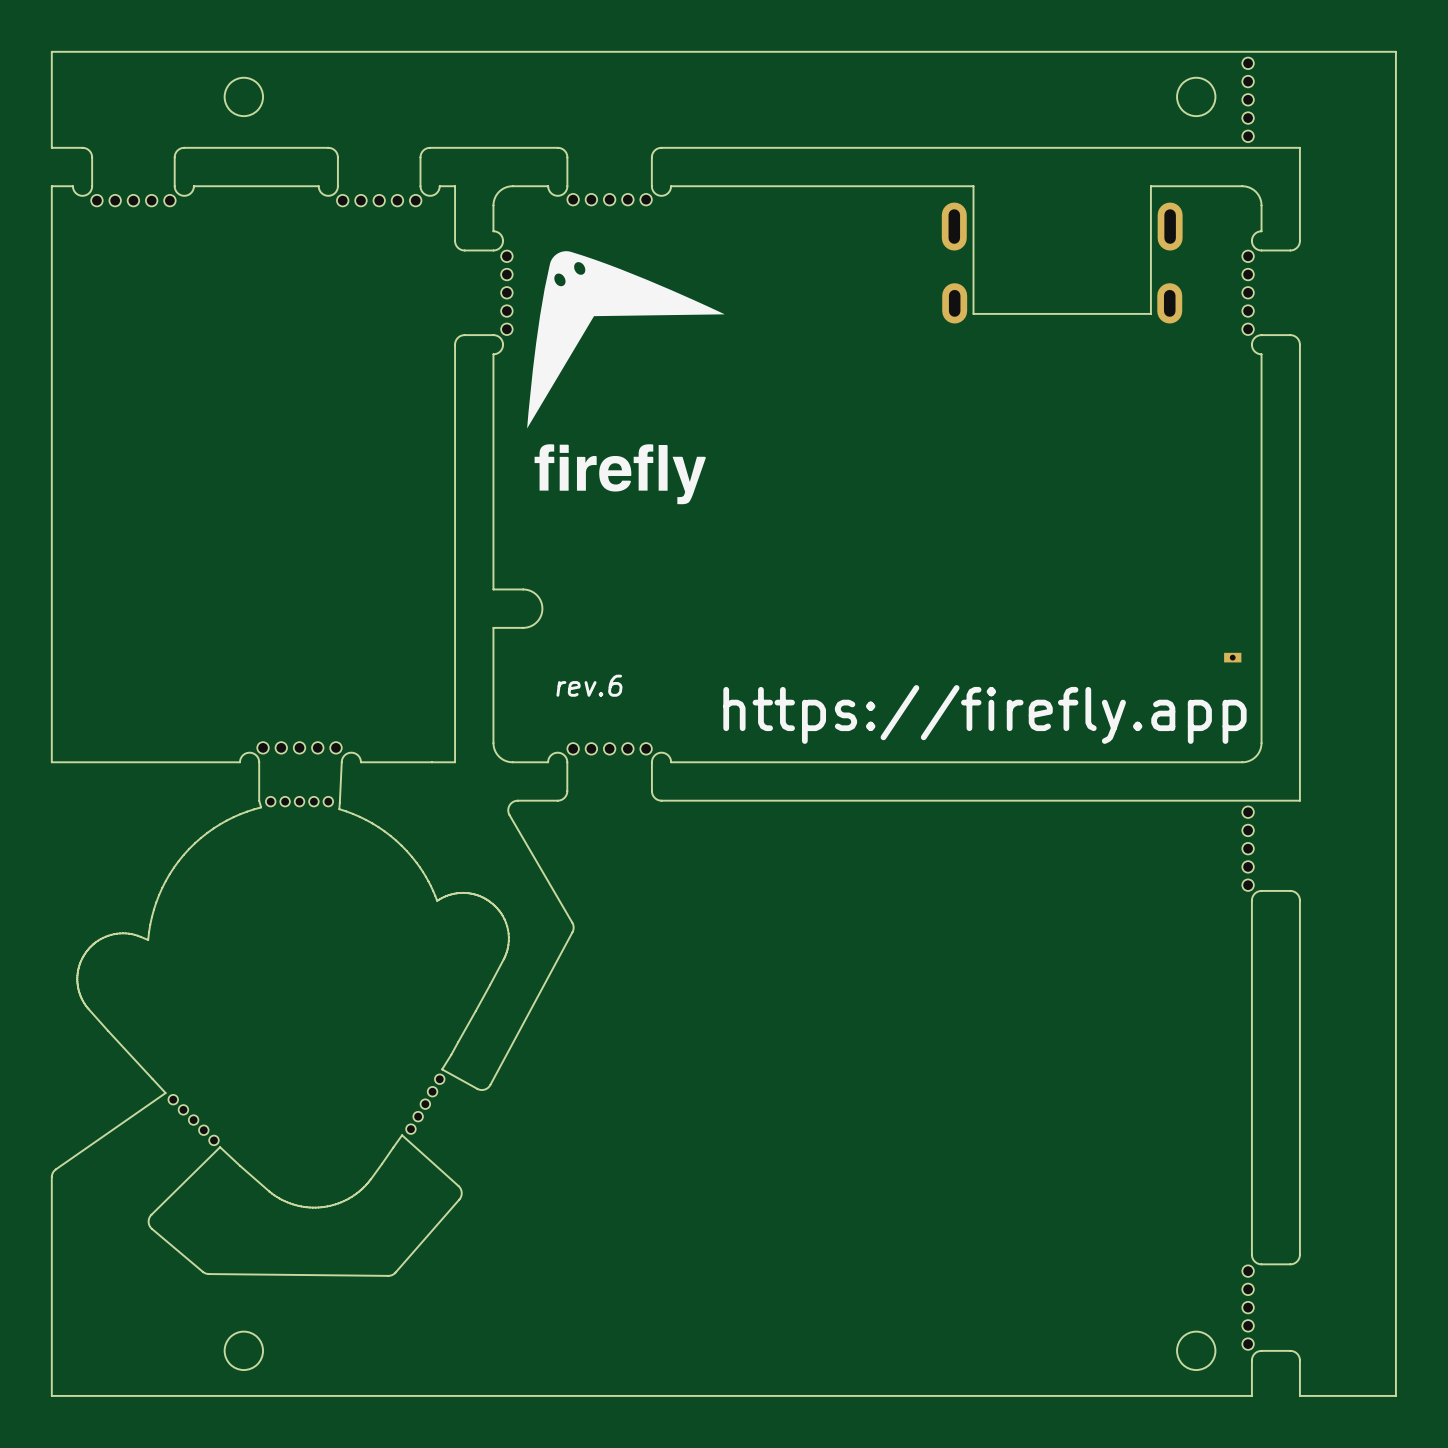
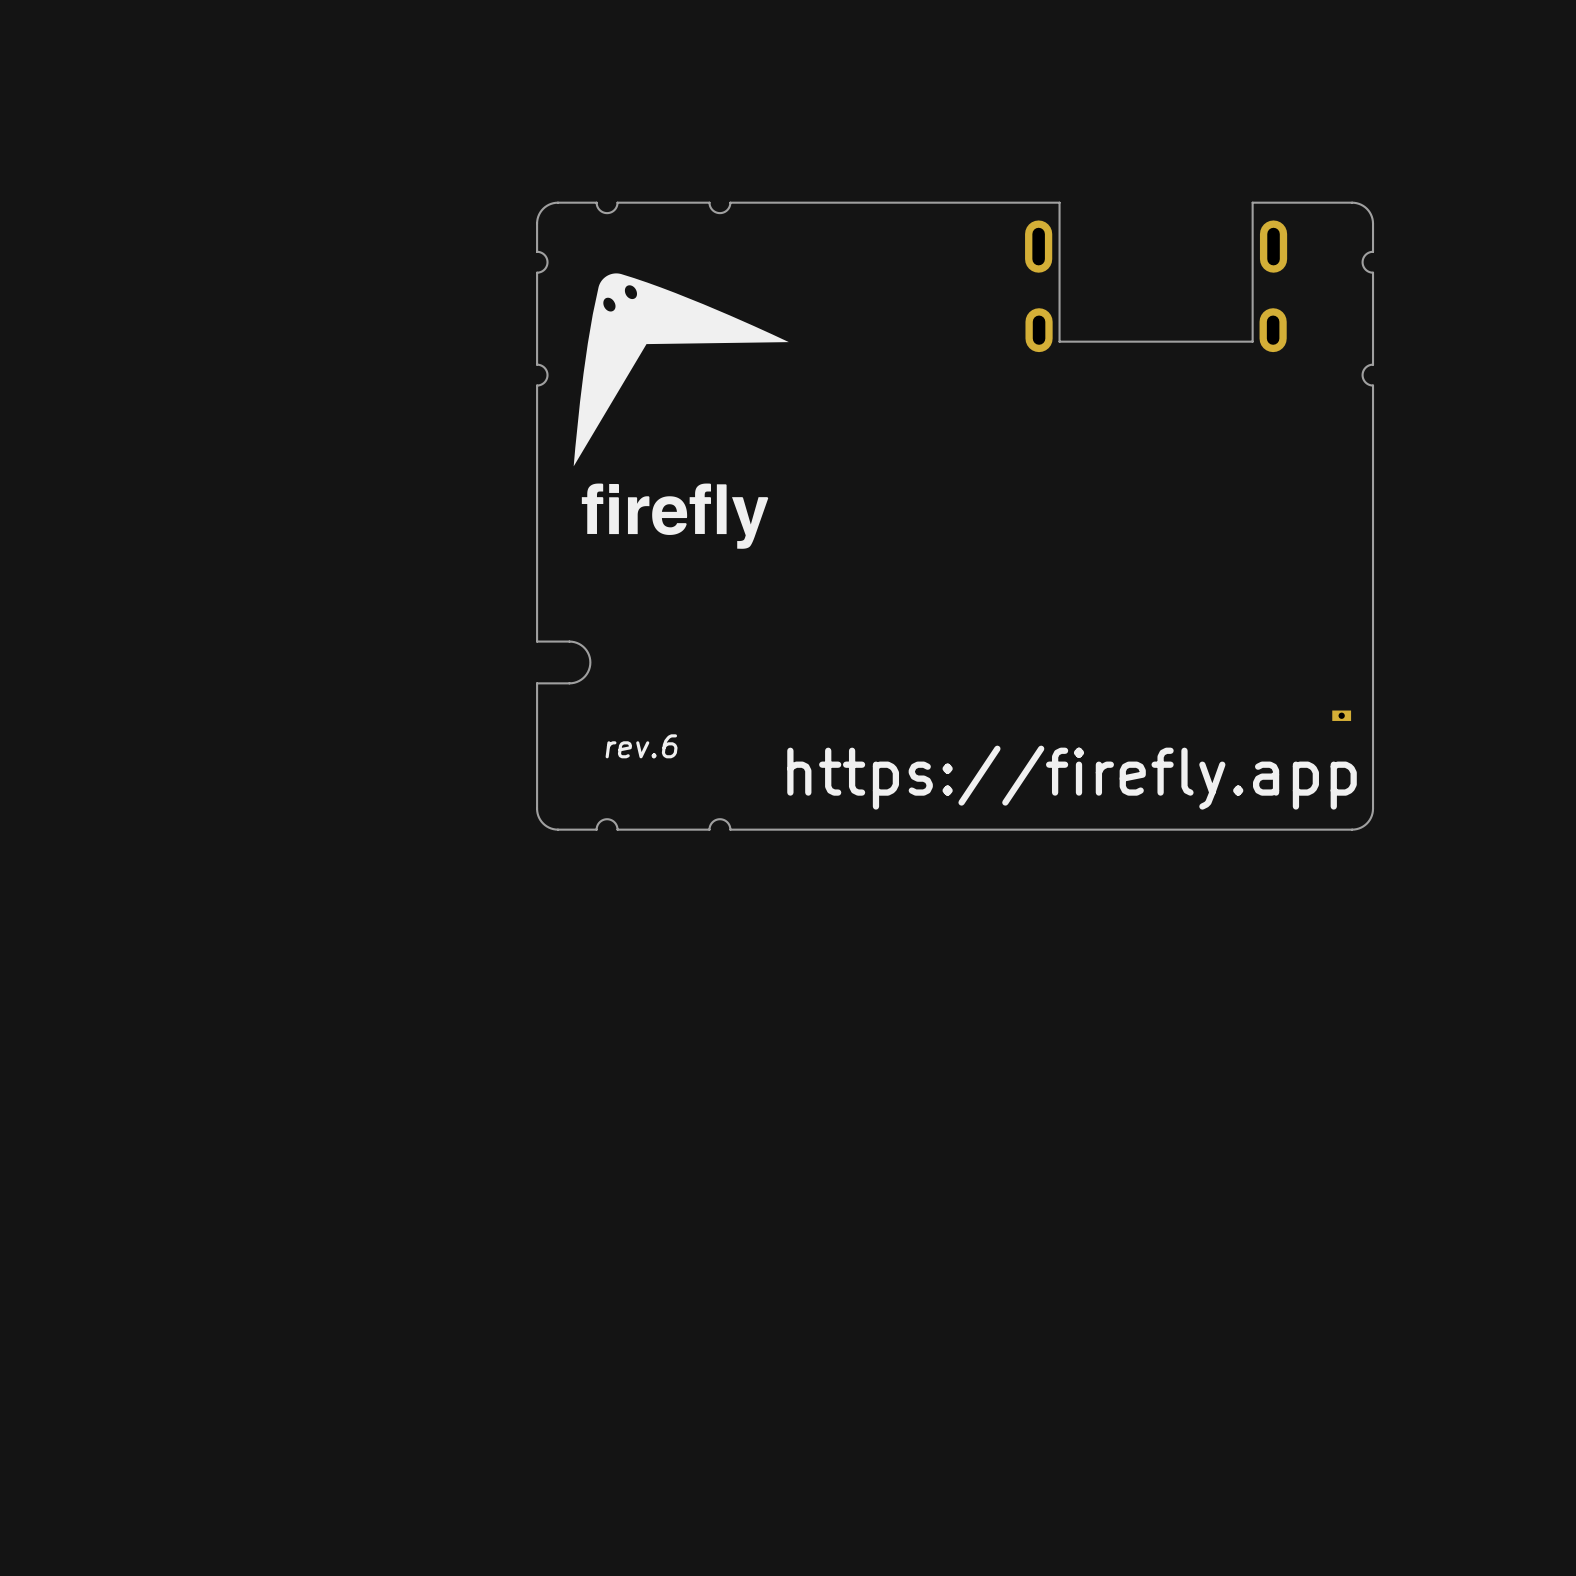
round board edge: [223, 76, 264, 118] -> none
round board edge: [1176, 76, 1217, 118] -> none
part: (1248, 99) -> none
board edge: (328, 147) (181, 148) (176, 151) (174, 156) (174, 188) (177, 193) (184, 195) (190, 193) (193, 186) (318, 186) (321, 193) (330, 195) (337, 188) (337, 157) (335, 150) (328, 147) -> none
board edge: (567, 186) (567, 156) (565, 151) (560, 148) (430, 147) (424, 149) (420, 157) (420, 186) (422, 192) (431, 195) (437, 192) (439, 186) (455, 186) (455, 240) (457, 246) (463, 250) (497, 249) (501, 245) (502, 239) (499, 233) (493, 231) -> (617, 202) (709, 202)
board edge: (651, 186) (652, 154) (655, 149) (661, 147) (1299, 147) (1299, 244) (1291, 250) (1257, 249) (1253, 245) (1252, 239) (1254, 234) (1261, 231) -> (1373, 385) (1366, 383) (1362, 376) (1364, 368) (1373, 364) (1373, 272) (1365, 269) (1362, 262) (1365, 254) (1373, 251)
part: (609, 199) -> none
part: (133, 200) -> none
part: (379, 200) -> none
part: (506, 292) -> none
part: (1248, 292) -> none
board edge: (493, 354) (500, 351) (502, 345) (501, 339) (495, 335) (463, 335) (457, 337) (455, 342) (455, 762) (360, 762) (356, 753) (347, 753) (341, 761) (339, 809) -> (537, 385) (544, 382) (547, 375) (544, 367) (537, 364) (537, 272) (545, 268) (547, 260) (544, 254) (537, 251)
board edge: (1261, 354) (1254, 351) (1252, 345) (1253, 339) (1259, 335) (1291, 335) (1296, 337) (1299, 342) (1299, 800) (659, 800) (653, 796) (652, 792) (652, 759) (656, 753) (662, 752) (669, 756) (671, 762) -> none
part: (299, 747) -> none
part: (609, 748) -> none
board edge: (548, 762) (550, 756) (555, 753) (561, 753) (566, 757) (567, 791) (565, 796) (558, 800) (515, 800) (509, 805) (508, 811) (572, 922) (573, 931) (489, 1086) (484, 1089) (478, 1089) (442, 1069) -> (596, 829) (599, 822) (605, 819) (614, 822) (617, 829) (709, 829) (712, 822) (719, 819) (727, 822) (730, 829)
board edge: (261, 807) (259, 800) (259, 761) (256, 755) (252, 753) (243, 754) (239, 762) (51, 762) (51, 186) (72, 186) (75, 192) (82, 195) (89, 192) (92, 186) (92, 156) (89, 150) (83, 147) (51, 147) (51, 51) (1395, 51) (1395, 1395) (1299, 1395) (1299, 1358) (1296, 1352) (1290, 1350) (1260, 1350) (1253, 1354) (1251, 1360) (1251, 1395) (51, 1395) (52, 1173) (55, 1169) (165, 1093) -> none
part: (1248, 848) -> none
board edge: (1290, 890) (1259, 891) (1254, 893) (1252, 899) (1251, 1254) (1253, 1260) (1260, 1264) (1292, 1264) (1297, 1261) (1299, 1255) (1299, 900) (1297, 893) (1290, 890) -> none
part: (293, 1002) -> none
board edge: (402, 1135) (458, 1186) (461, 1193) (459, 1199) (395, 1272) (389, 1275) (208, 1274) (202, 1271) (152, 1228) (148, 1220) (151, 1214) (220, 1147) -> none
part: (1248, 1307) -> none
round board edge: [223, 1330, 264, 1371] -> none
round board edge: [1176, 1330, 1217, 1371] -> none

